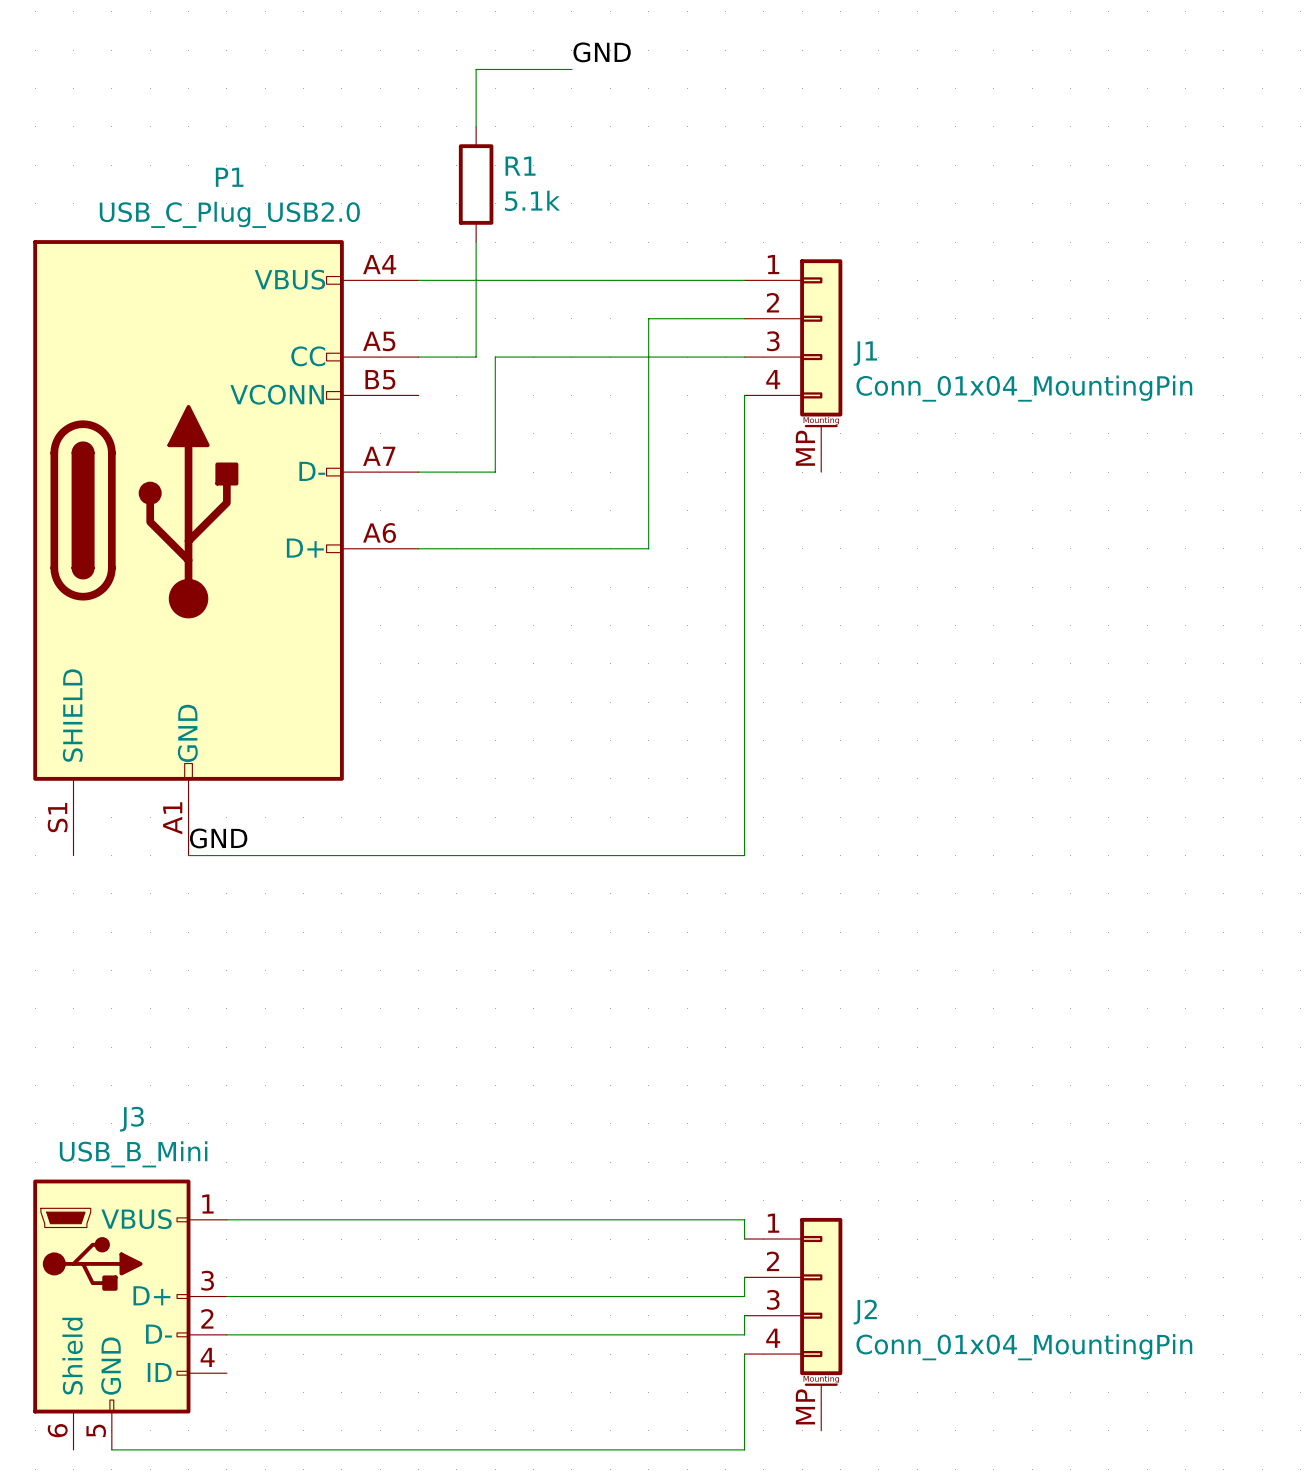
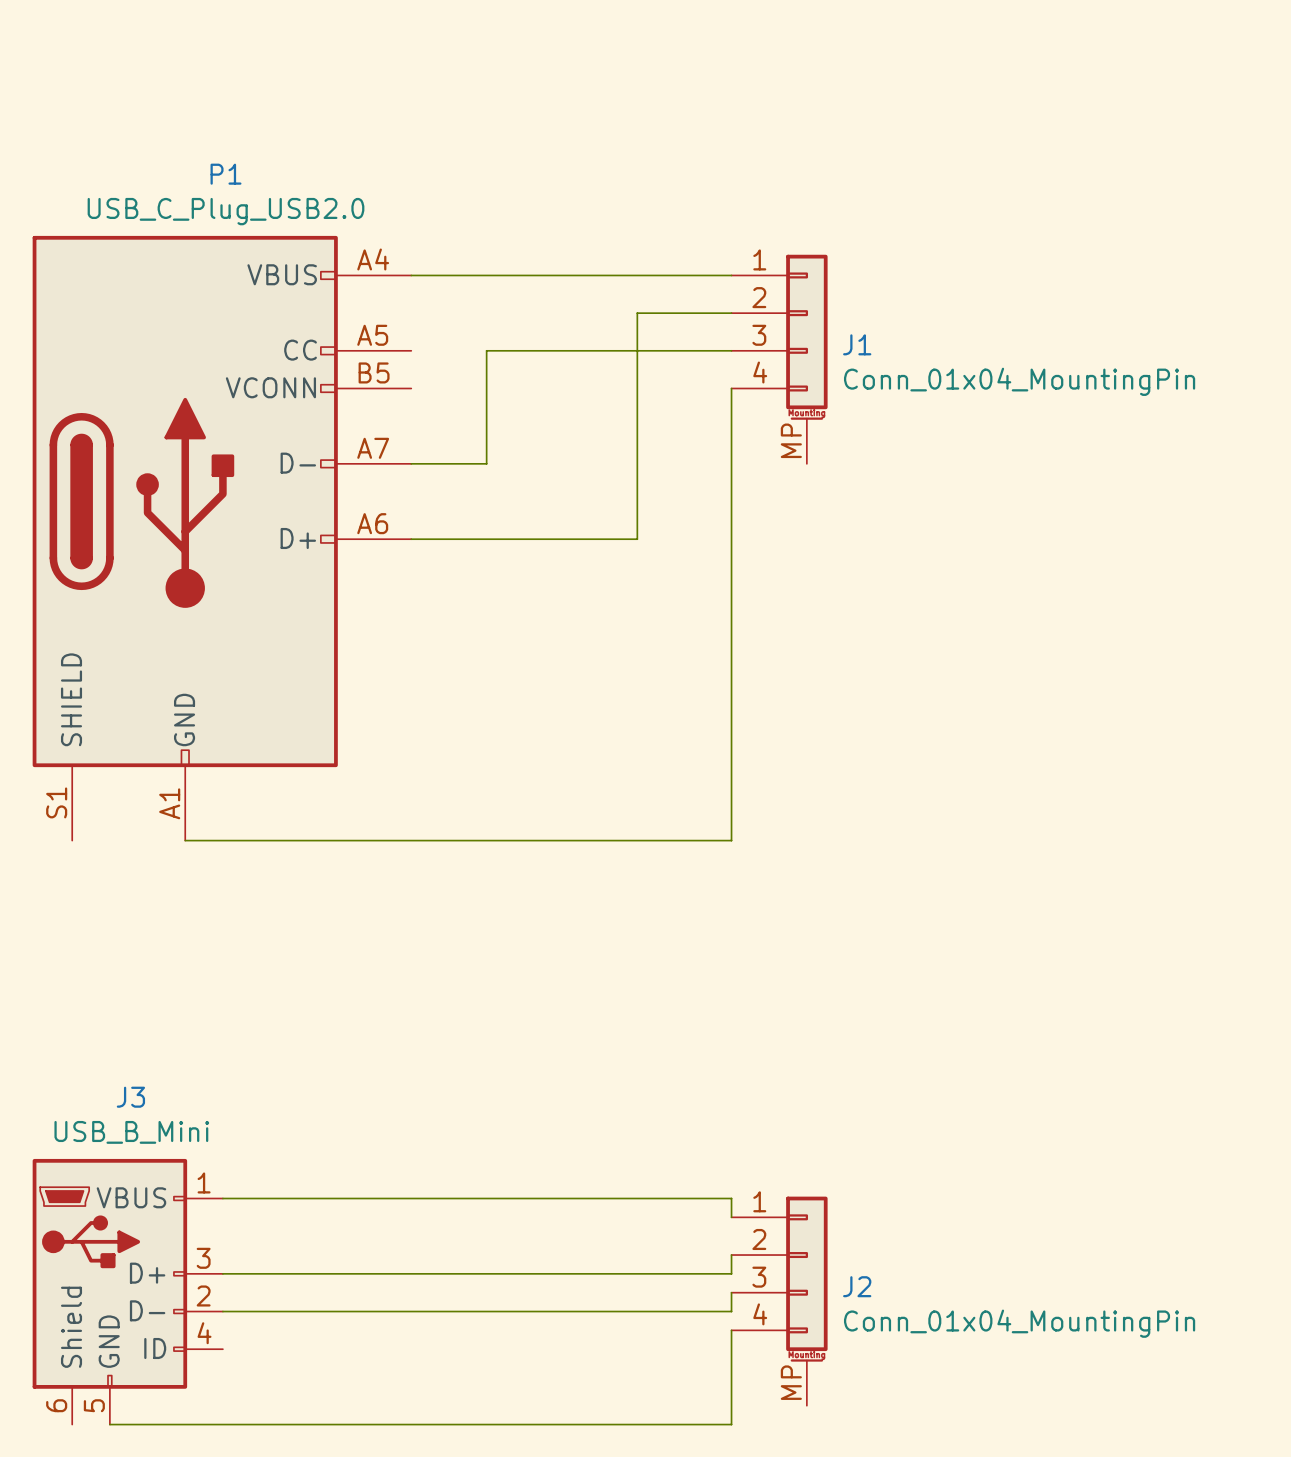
label: GND (602, 52) -> none
wire: (571, 69) (476, 69) (476, 126) -> none
R1: 5.1k (476, 184) -> none
wire: (476, 242) (476, 357) (418, 357) -> none
label: GND (218, 838) -> none

